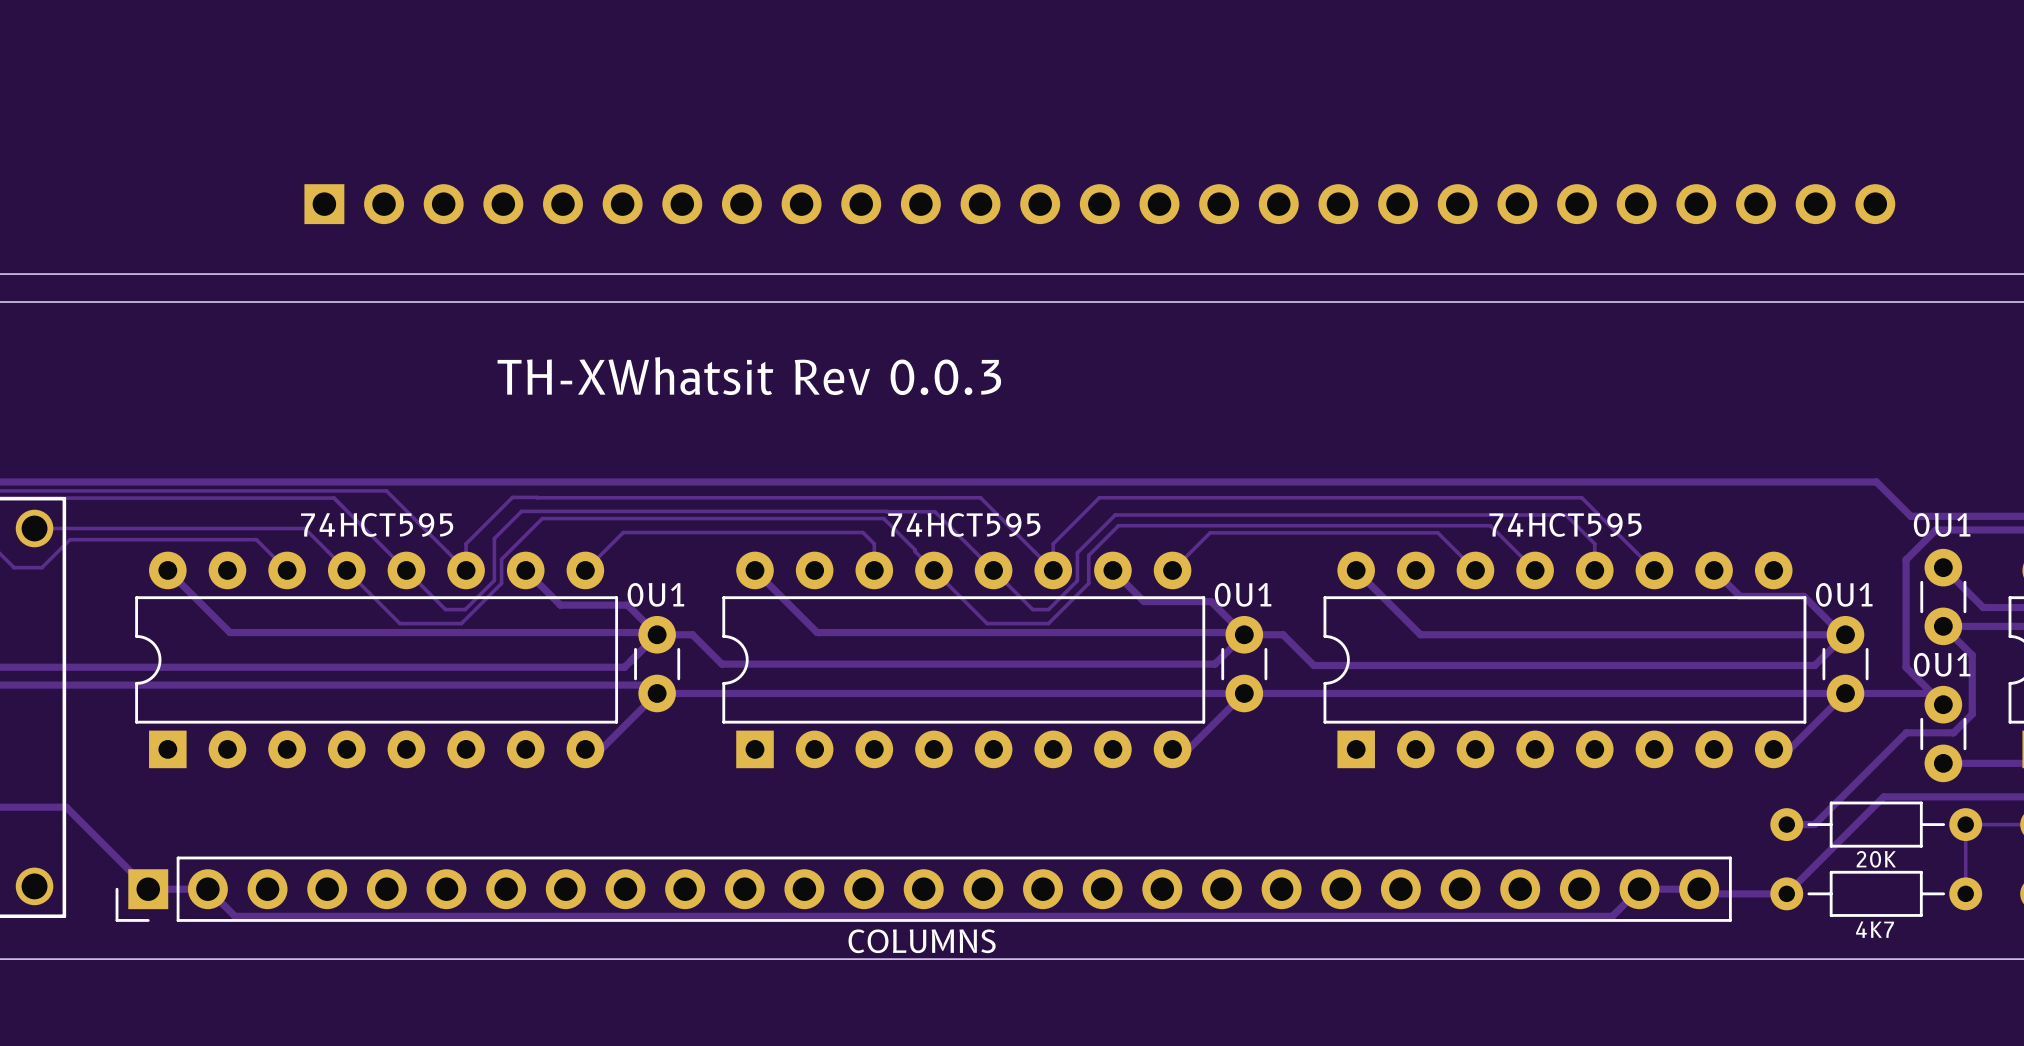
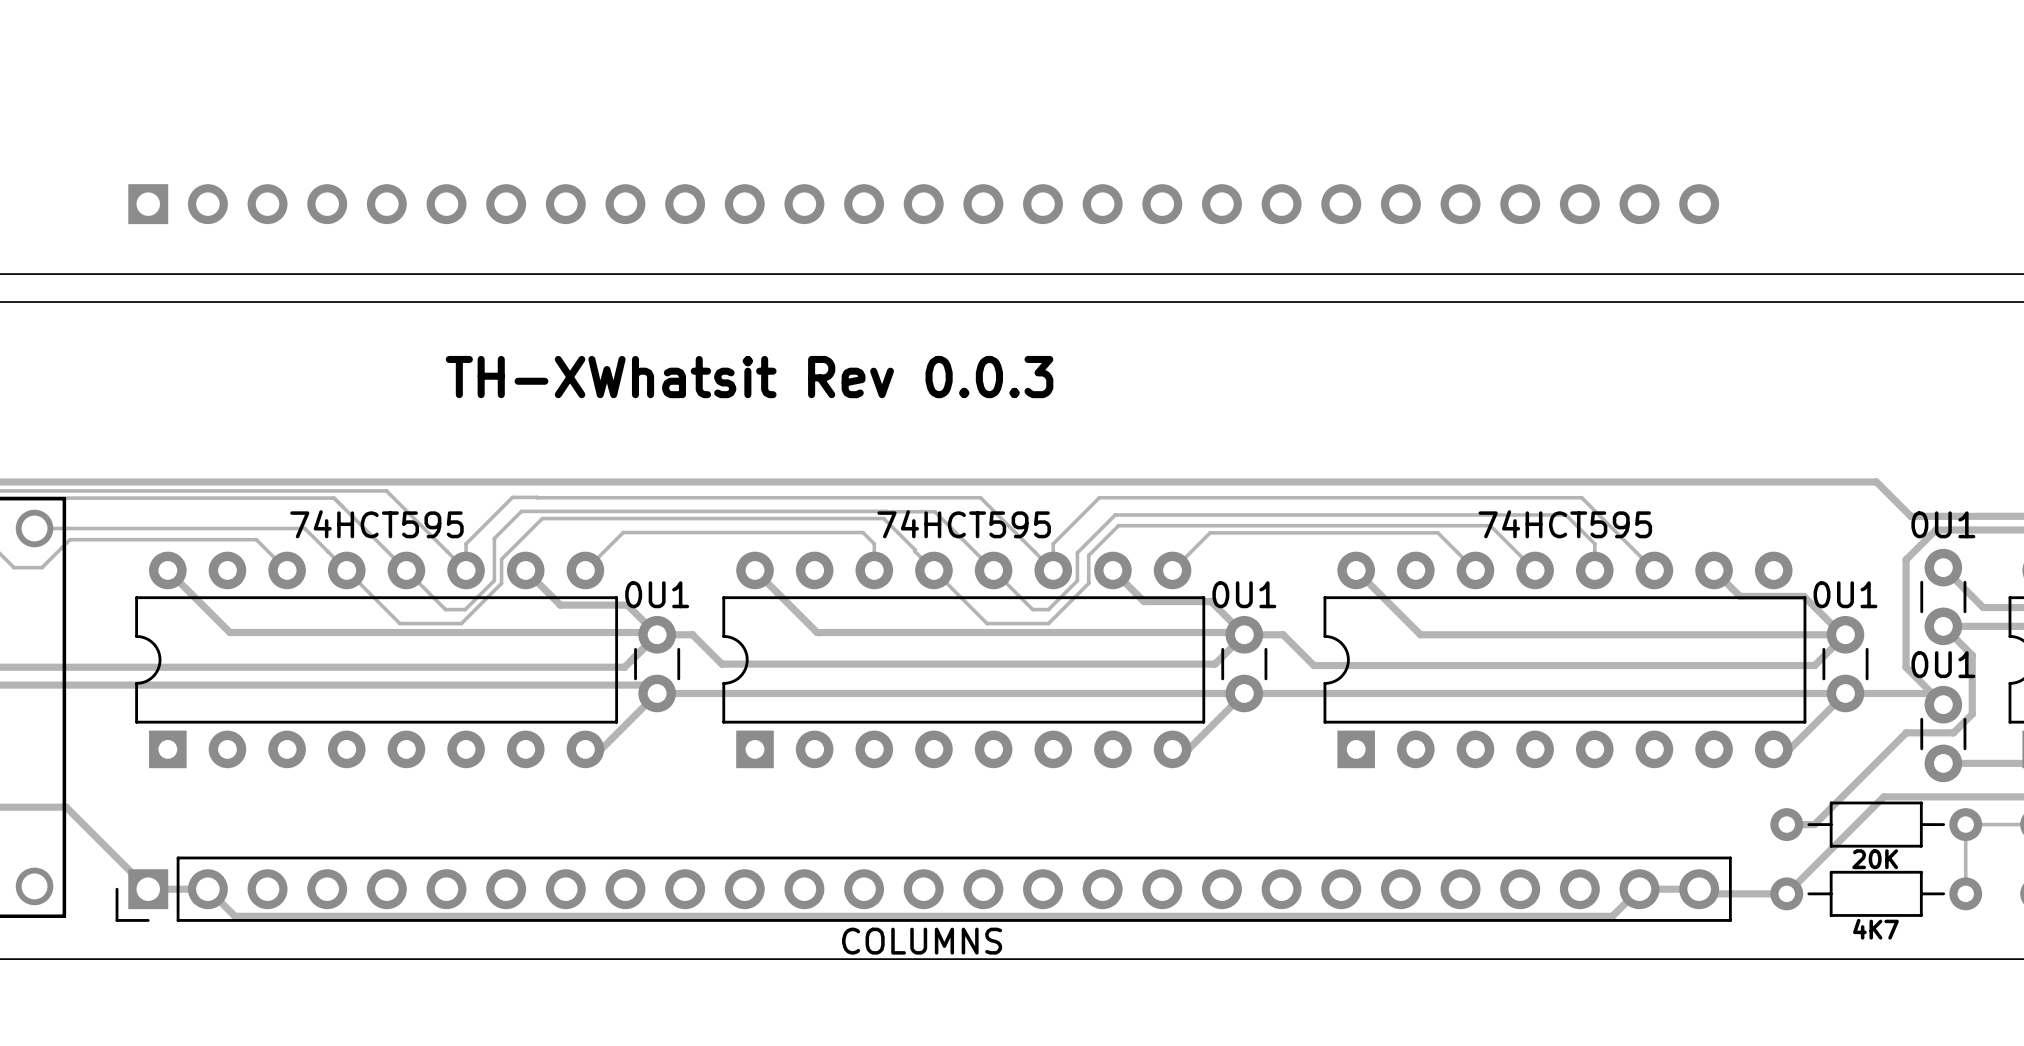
part position: (1099, 204) -> (923, 204)

